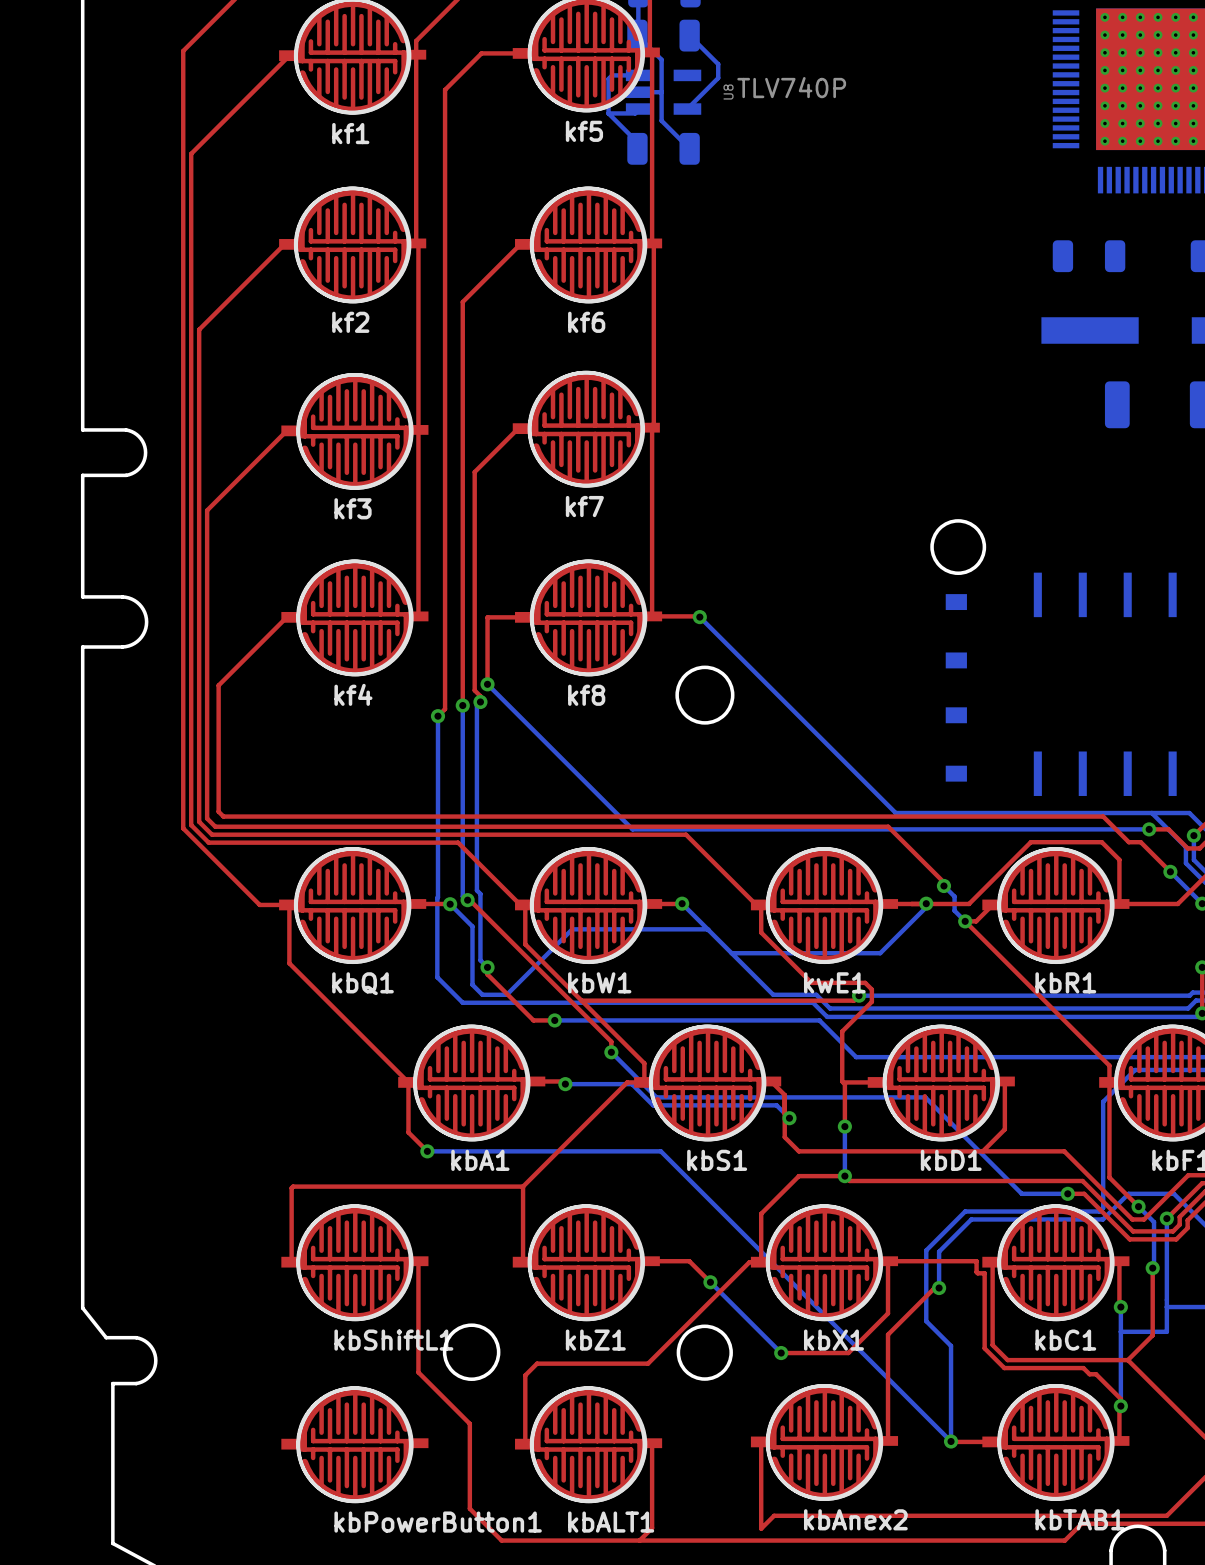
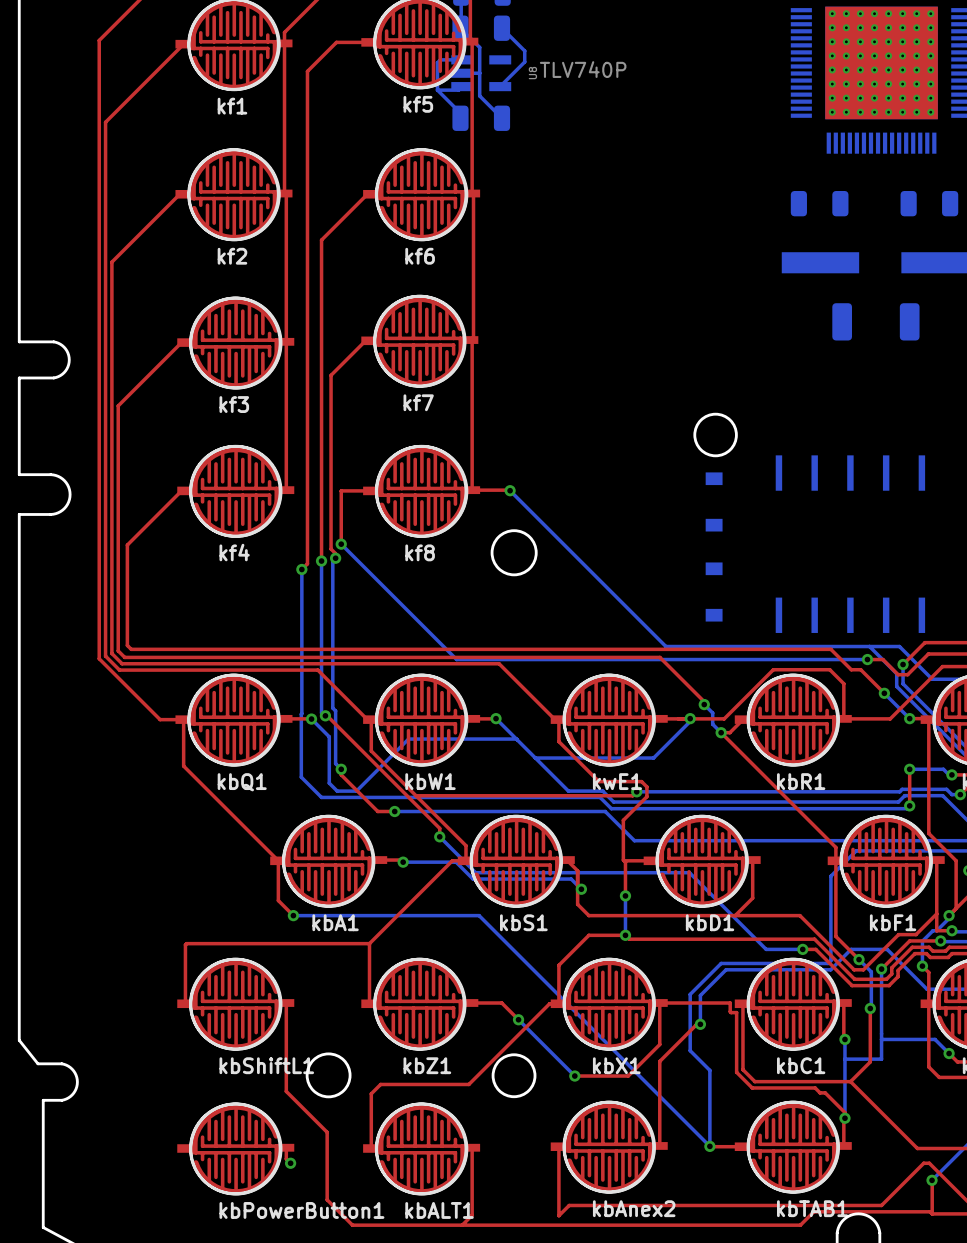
top track: none -> (286, 1147) (286, 1158) (290, 1163)
via: none -> (290, 1163)

